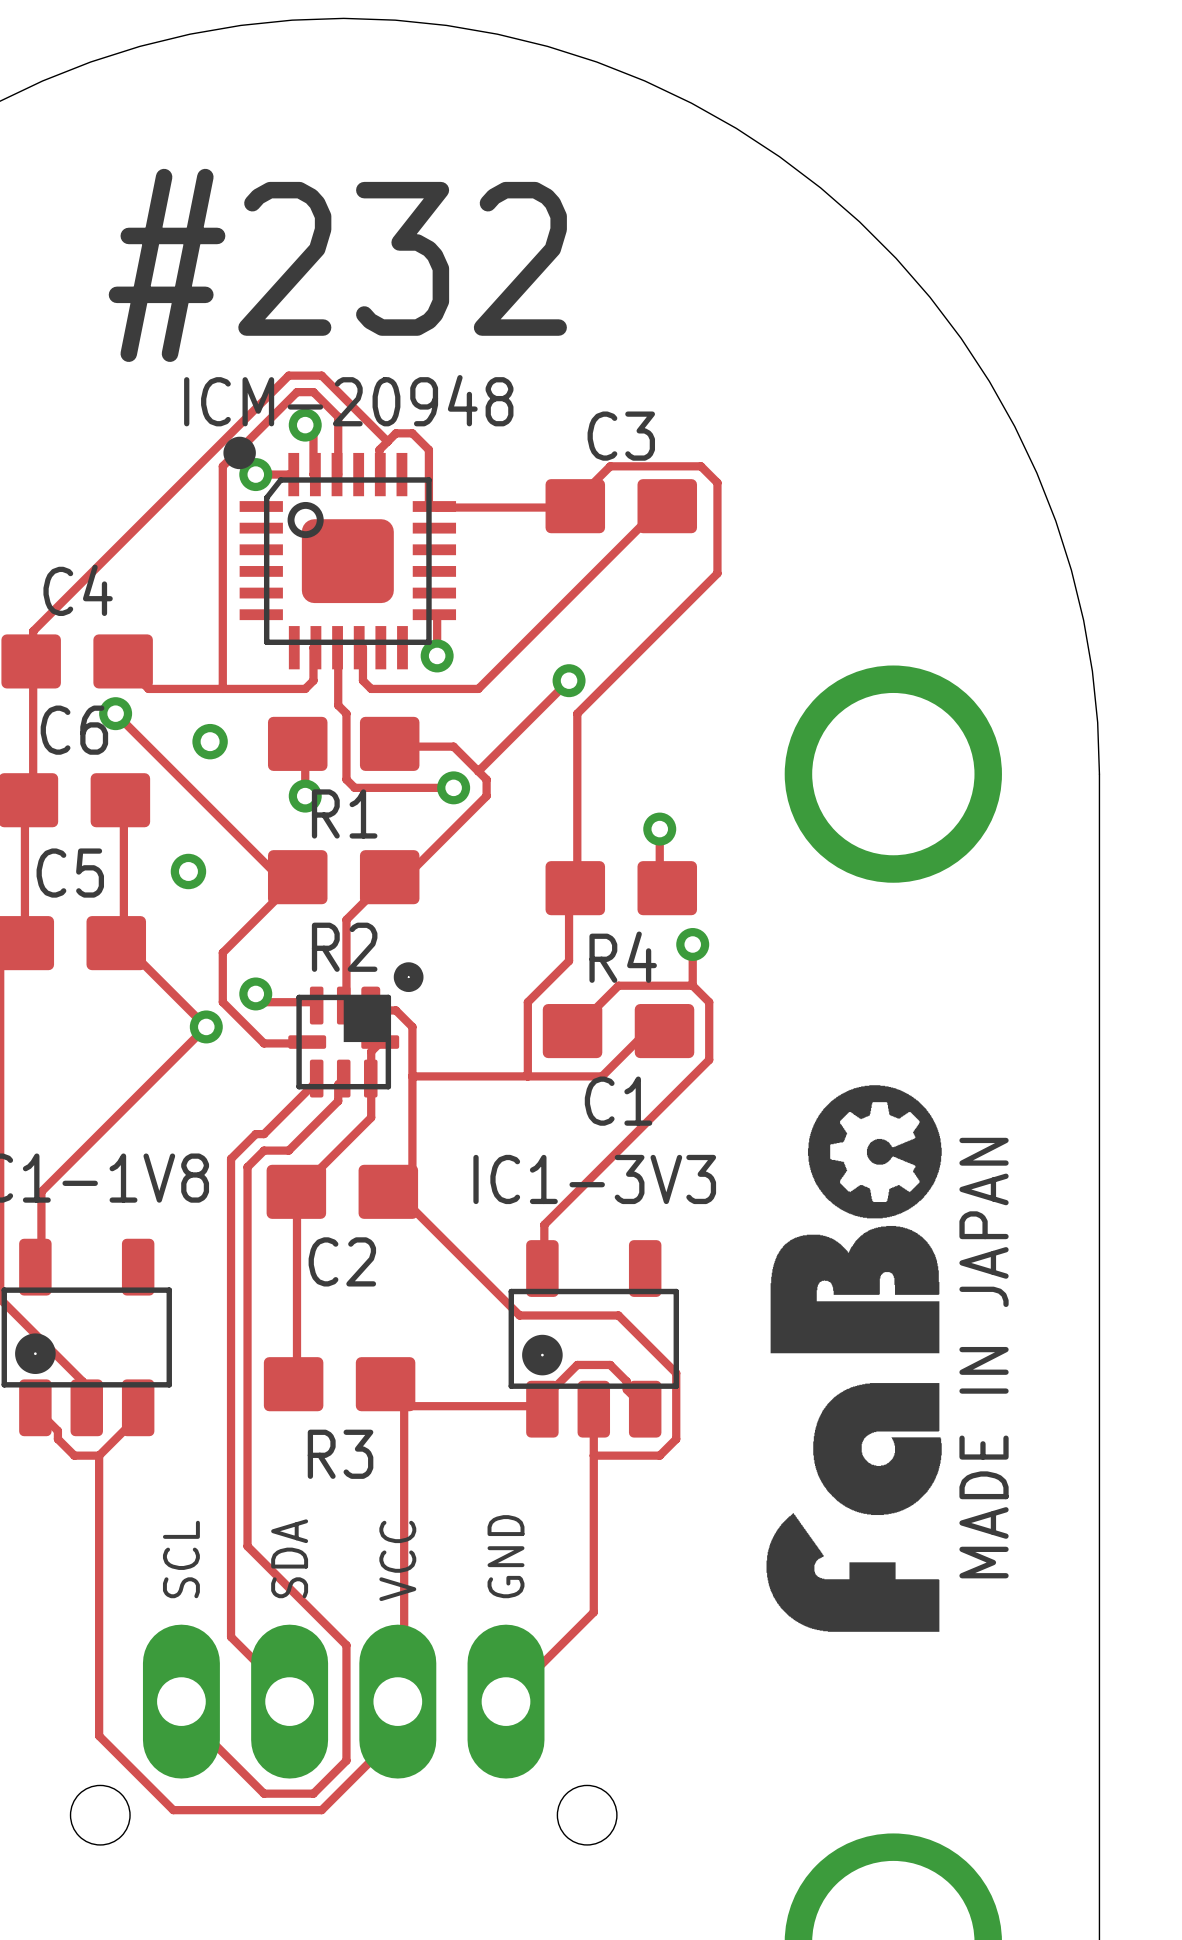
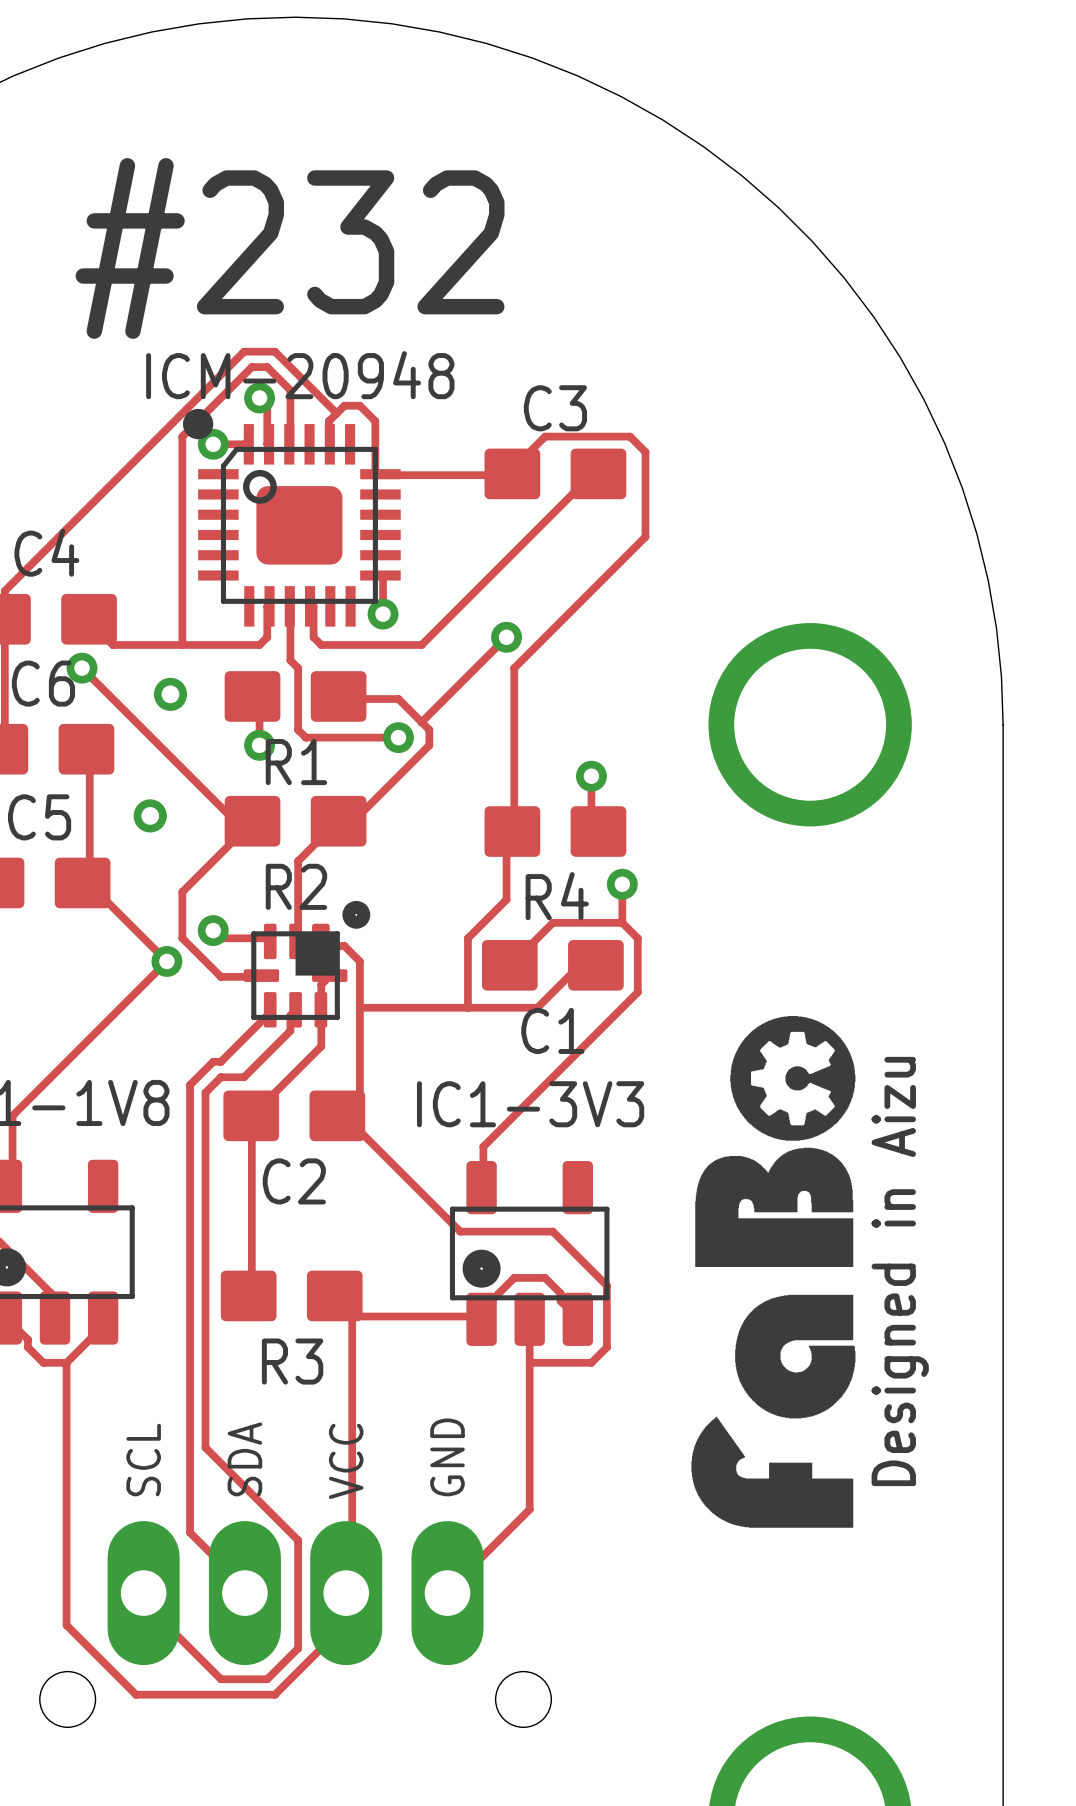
text: MADE IN JAPAN (984, 1358) -> Designed in Aizu (900, 1271)

